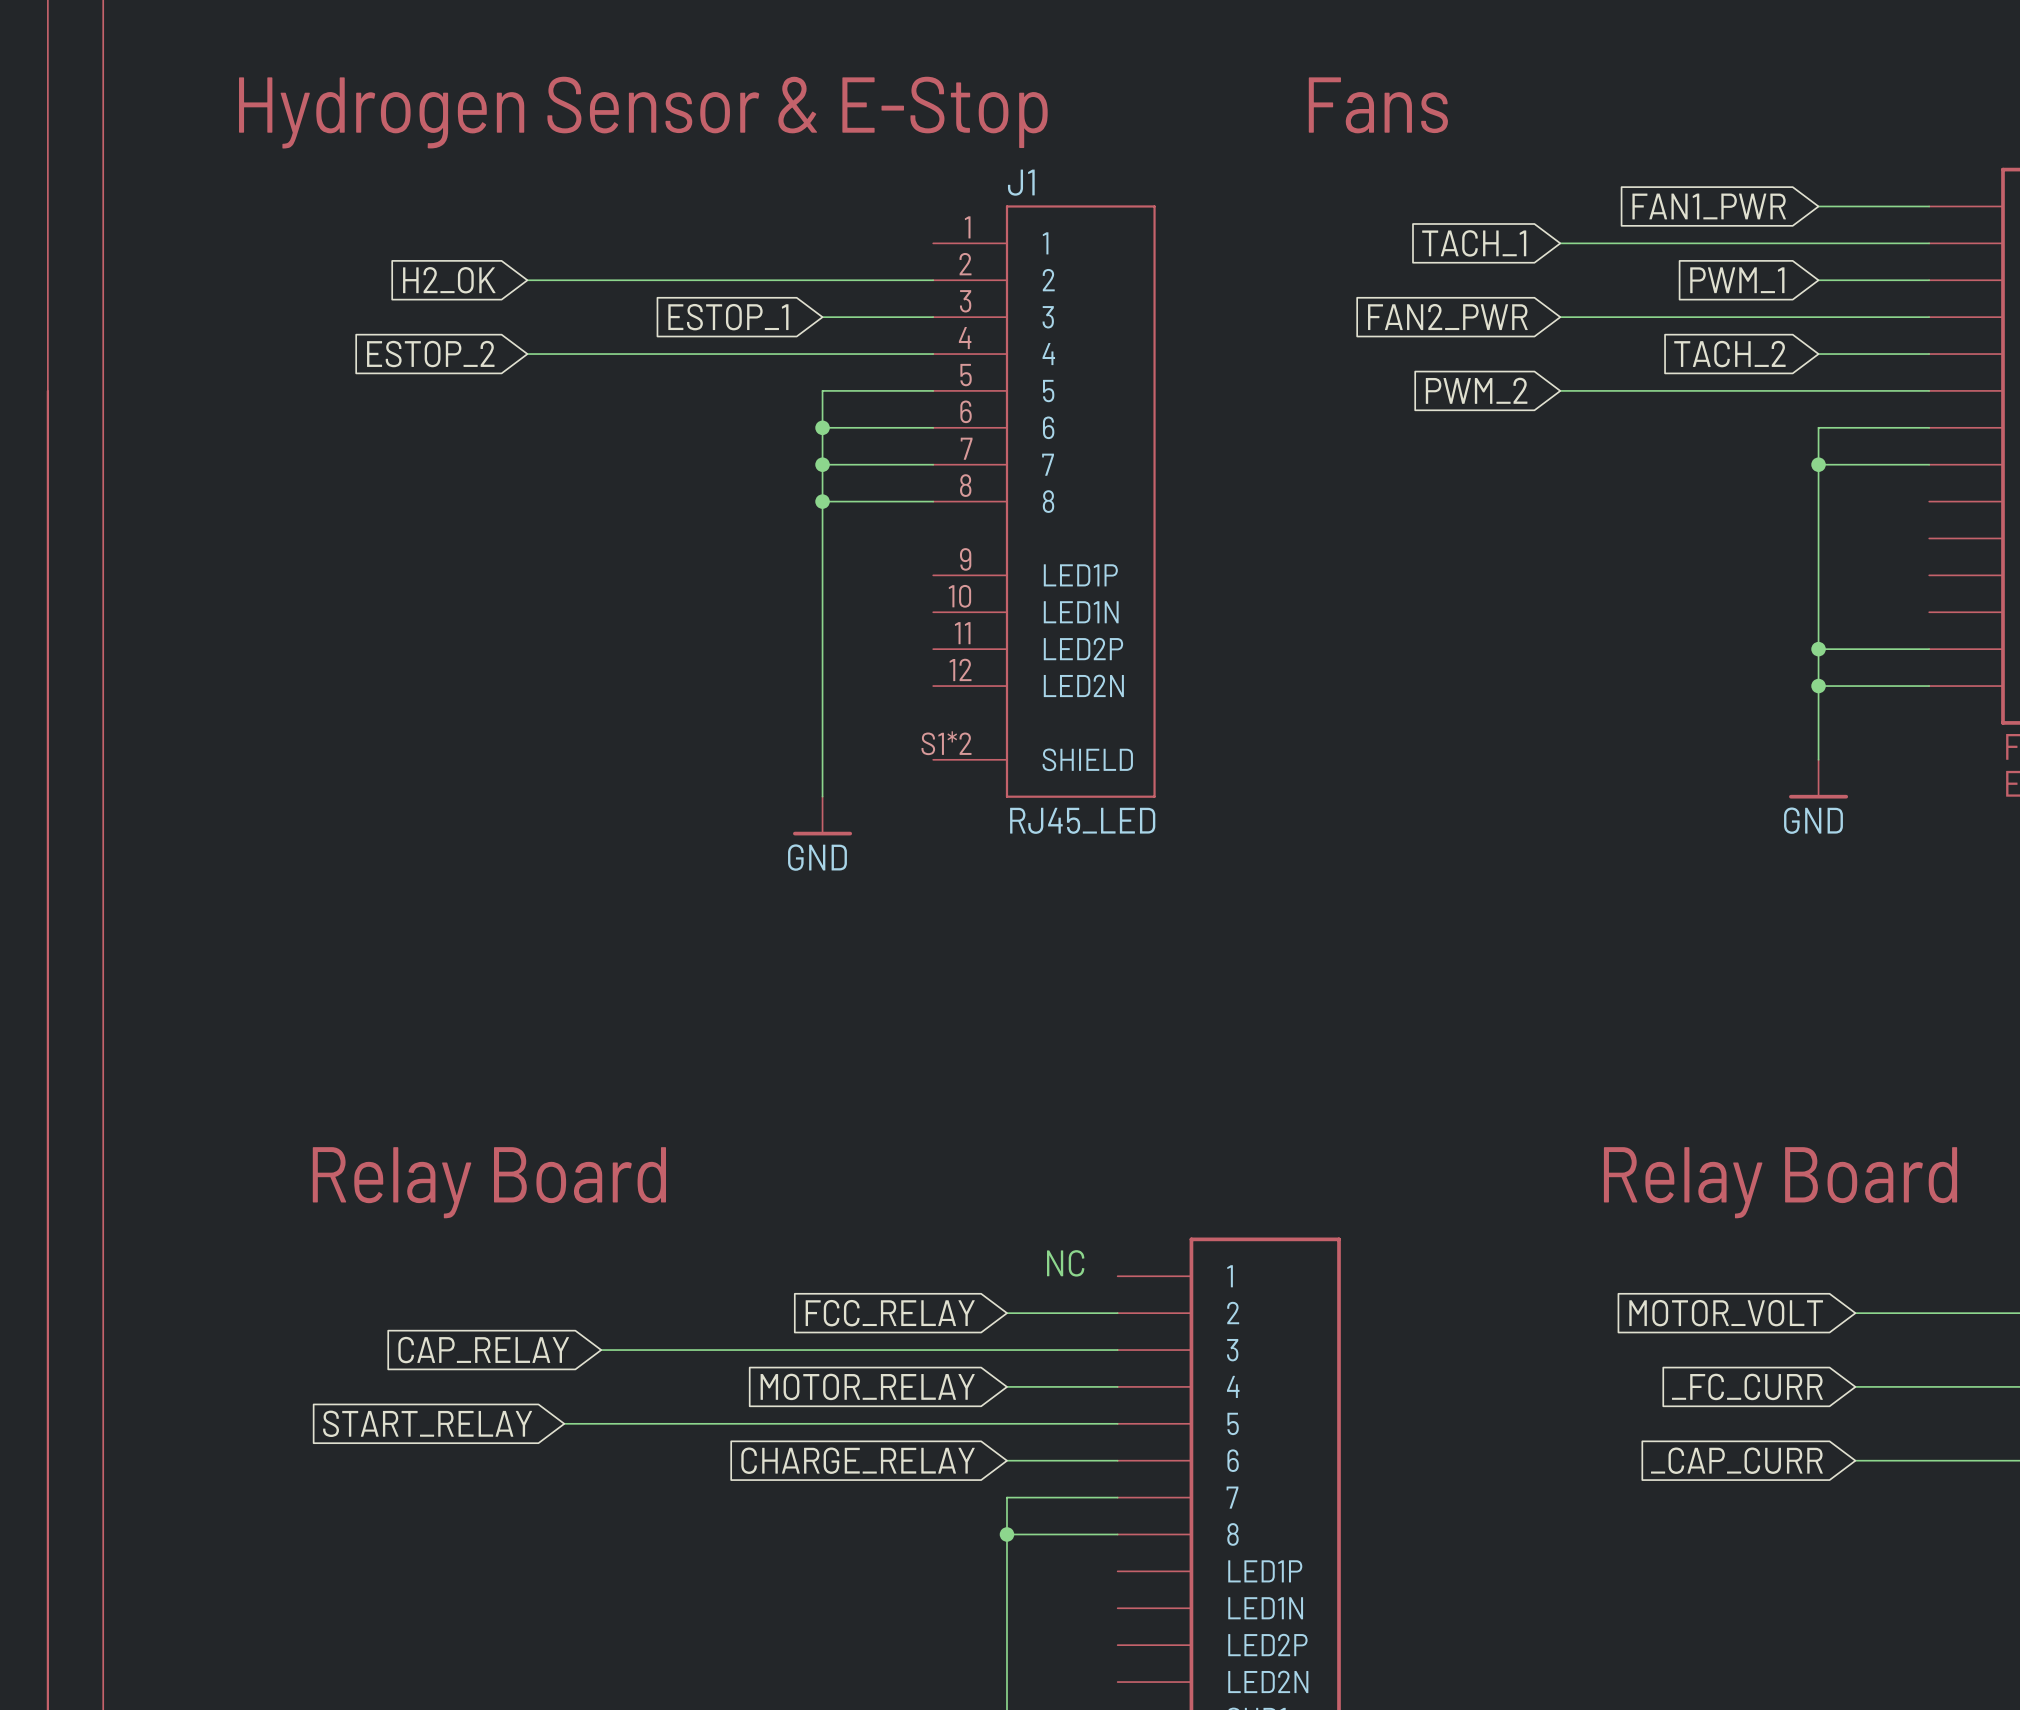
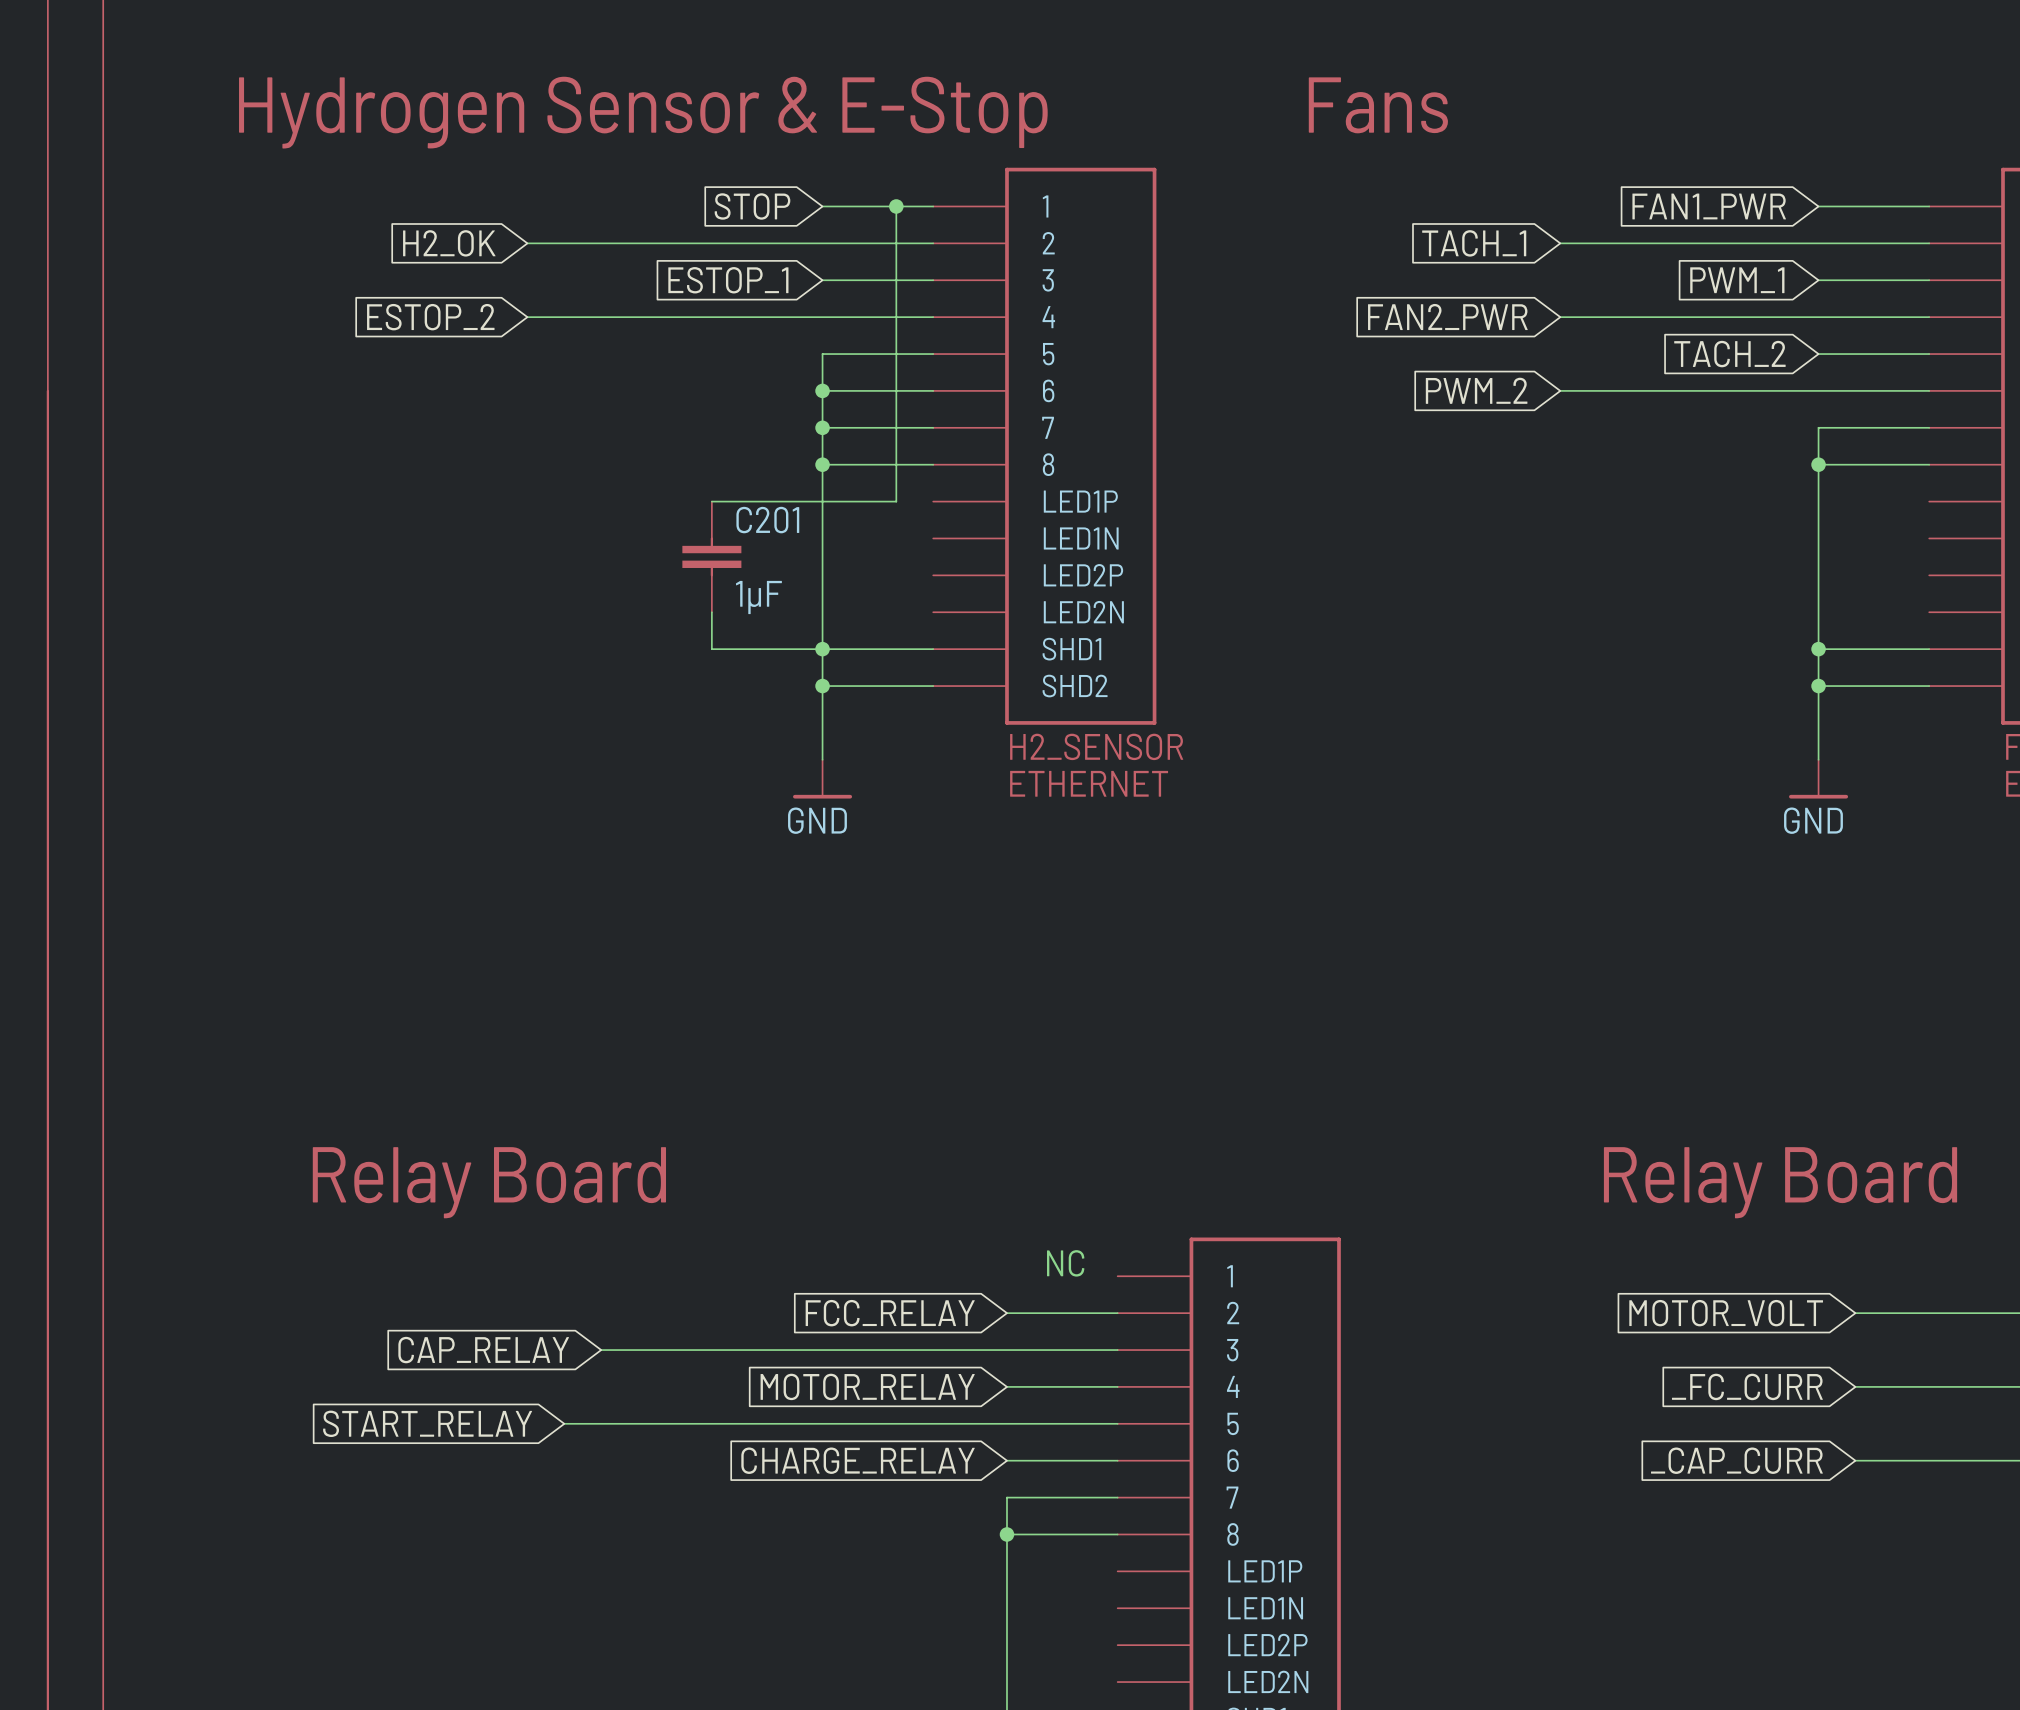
global label: none -> STOP (752, 206)
wire: none -> (822, 206) (933, 206)
junction: none -> (896, 206)
wire: none -> (527, 243) (933, 243)
global label position: H2_OK (449, 280) -> H2_OK (449, 243)
wire: (527, 280) (822, 280) -> (527, 317) (822, 317)
global label position: ESTOP_1 (728, 317) -> ESTOP_1 (728, 280)
global label position: ESTOP_2 (430, 354) -> ESTOP_2 (430, 317)
wire: (527, 354) (822, 354) -> (822, 390) (822, 354)
junction: none -> (822, 390)
H2_SENSOR: none -> ETHERNET (1044, 446)
wire: none -> (711, 501) (822, 501)
junction: (822, 501) -> none
wire: (896, 501) (933, 501) -> (896, 501) (896, 206)
J1: RJ45_LED (1044, 501) -> none
C201: none -> 1µF (711, 556)
wire: none -> (711, 612) (711, 649) (933, 649)
junction: none -> (822, 649)
wire: none -> (822, 686) (933, 686)
junction: none -> (822, 686)
power symbol position: GND (822, 816) -> GND (822, 779)

